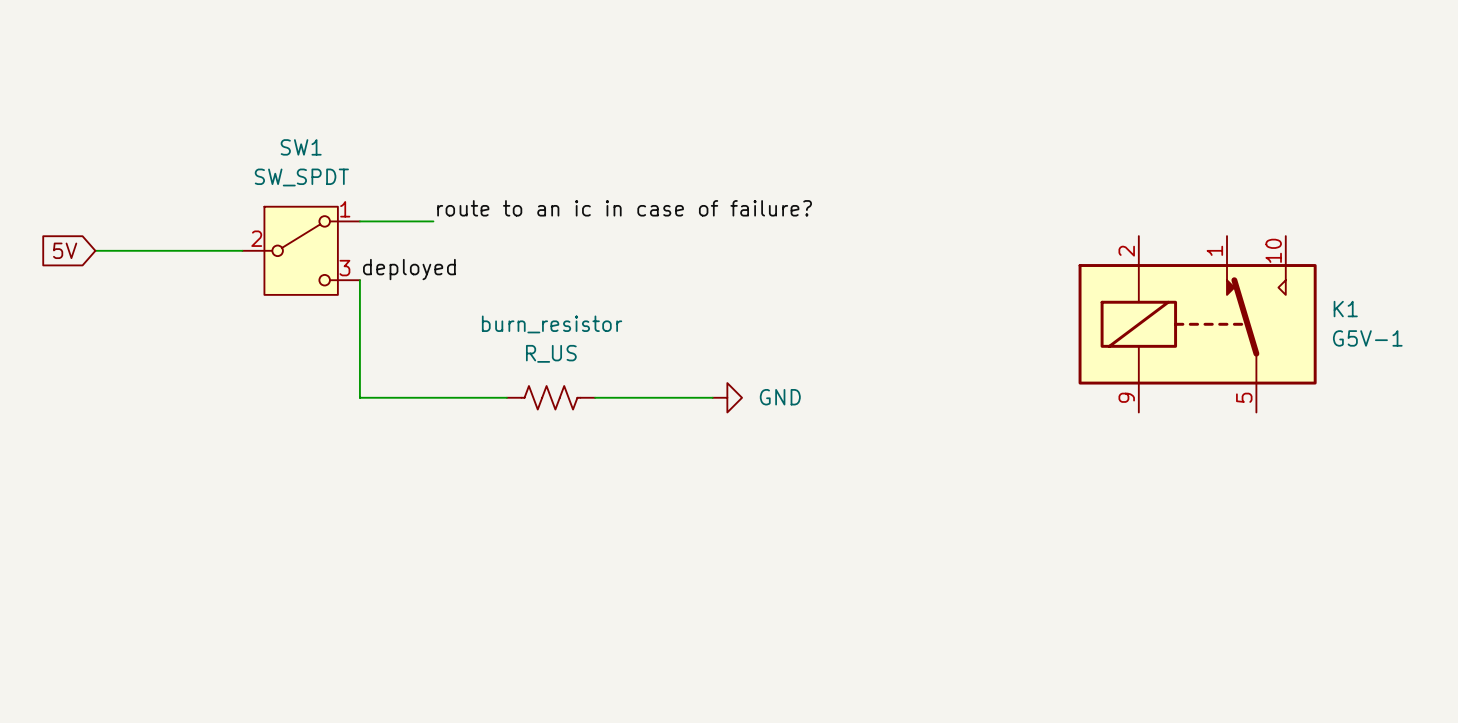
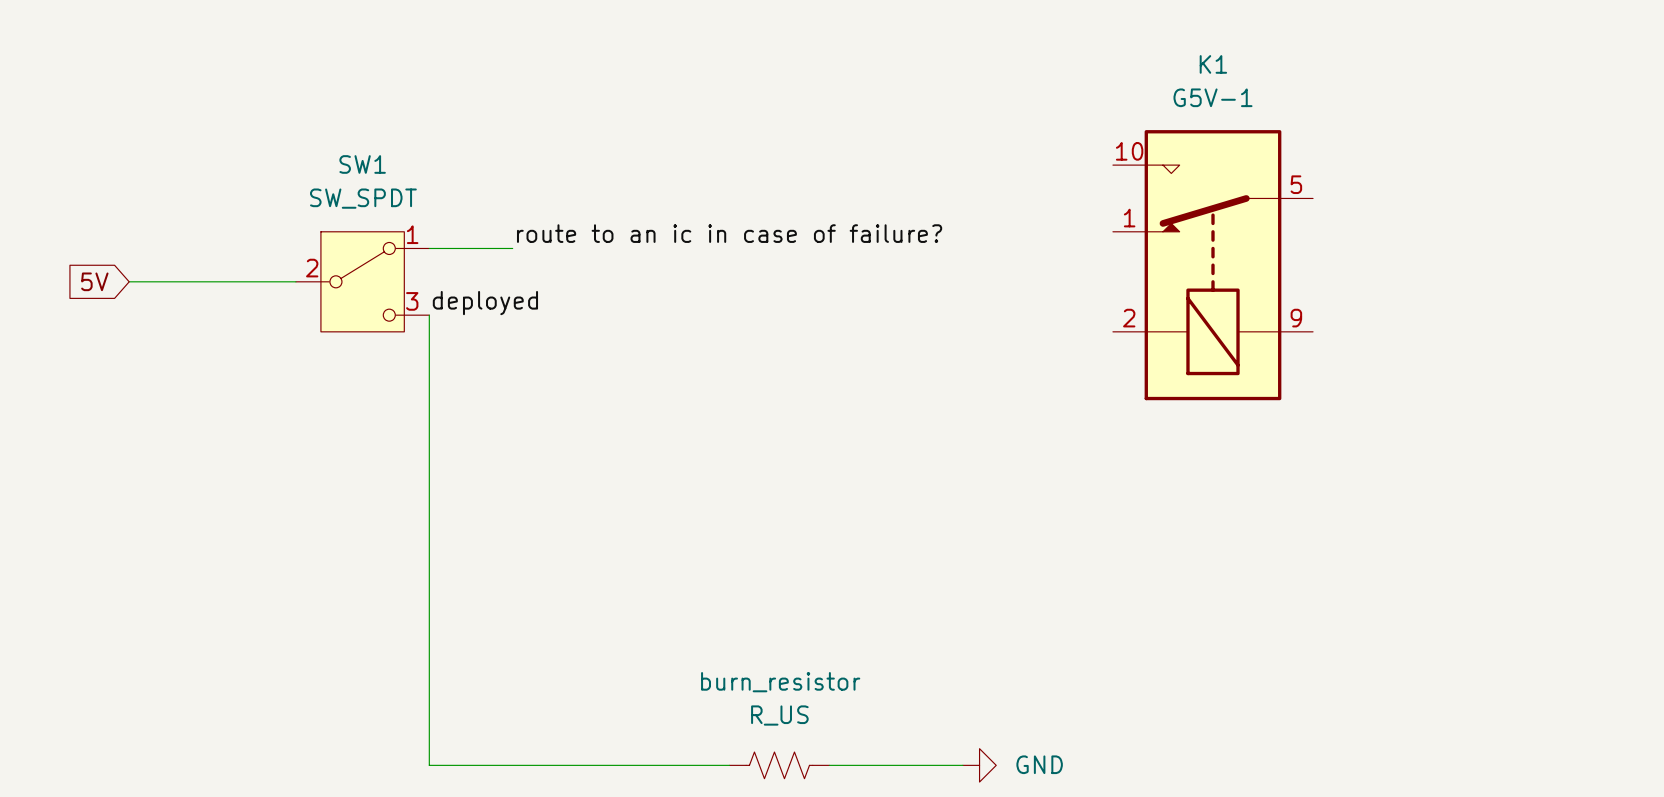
K1 name position: K1 (1345, 309) -> K1 (1213, 64)
K1 rotation: 0° (1197, 324) -> 90° counterclockwise (1212, 265)
K1 position: (1197, 324) -> (1212, 265)
K1 value position: G5V-1 (1367, 338) -> G5V-1 (1212, 97)
wire: (359, 397) (506, 397) -> (429, 448) (429, 765) (729, 765)
burn_resistor: R_US (550, 397) -> none
wire: (595, 397) (712, 397) -> none
power symbol: GND (727, 397) -> none
burn_resistor: none -> R_US (779, 765)
wire: none -> (829, 765) (962, 765)
power symbol: none -> GND (979, 765)

